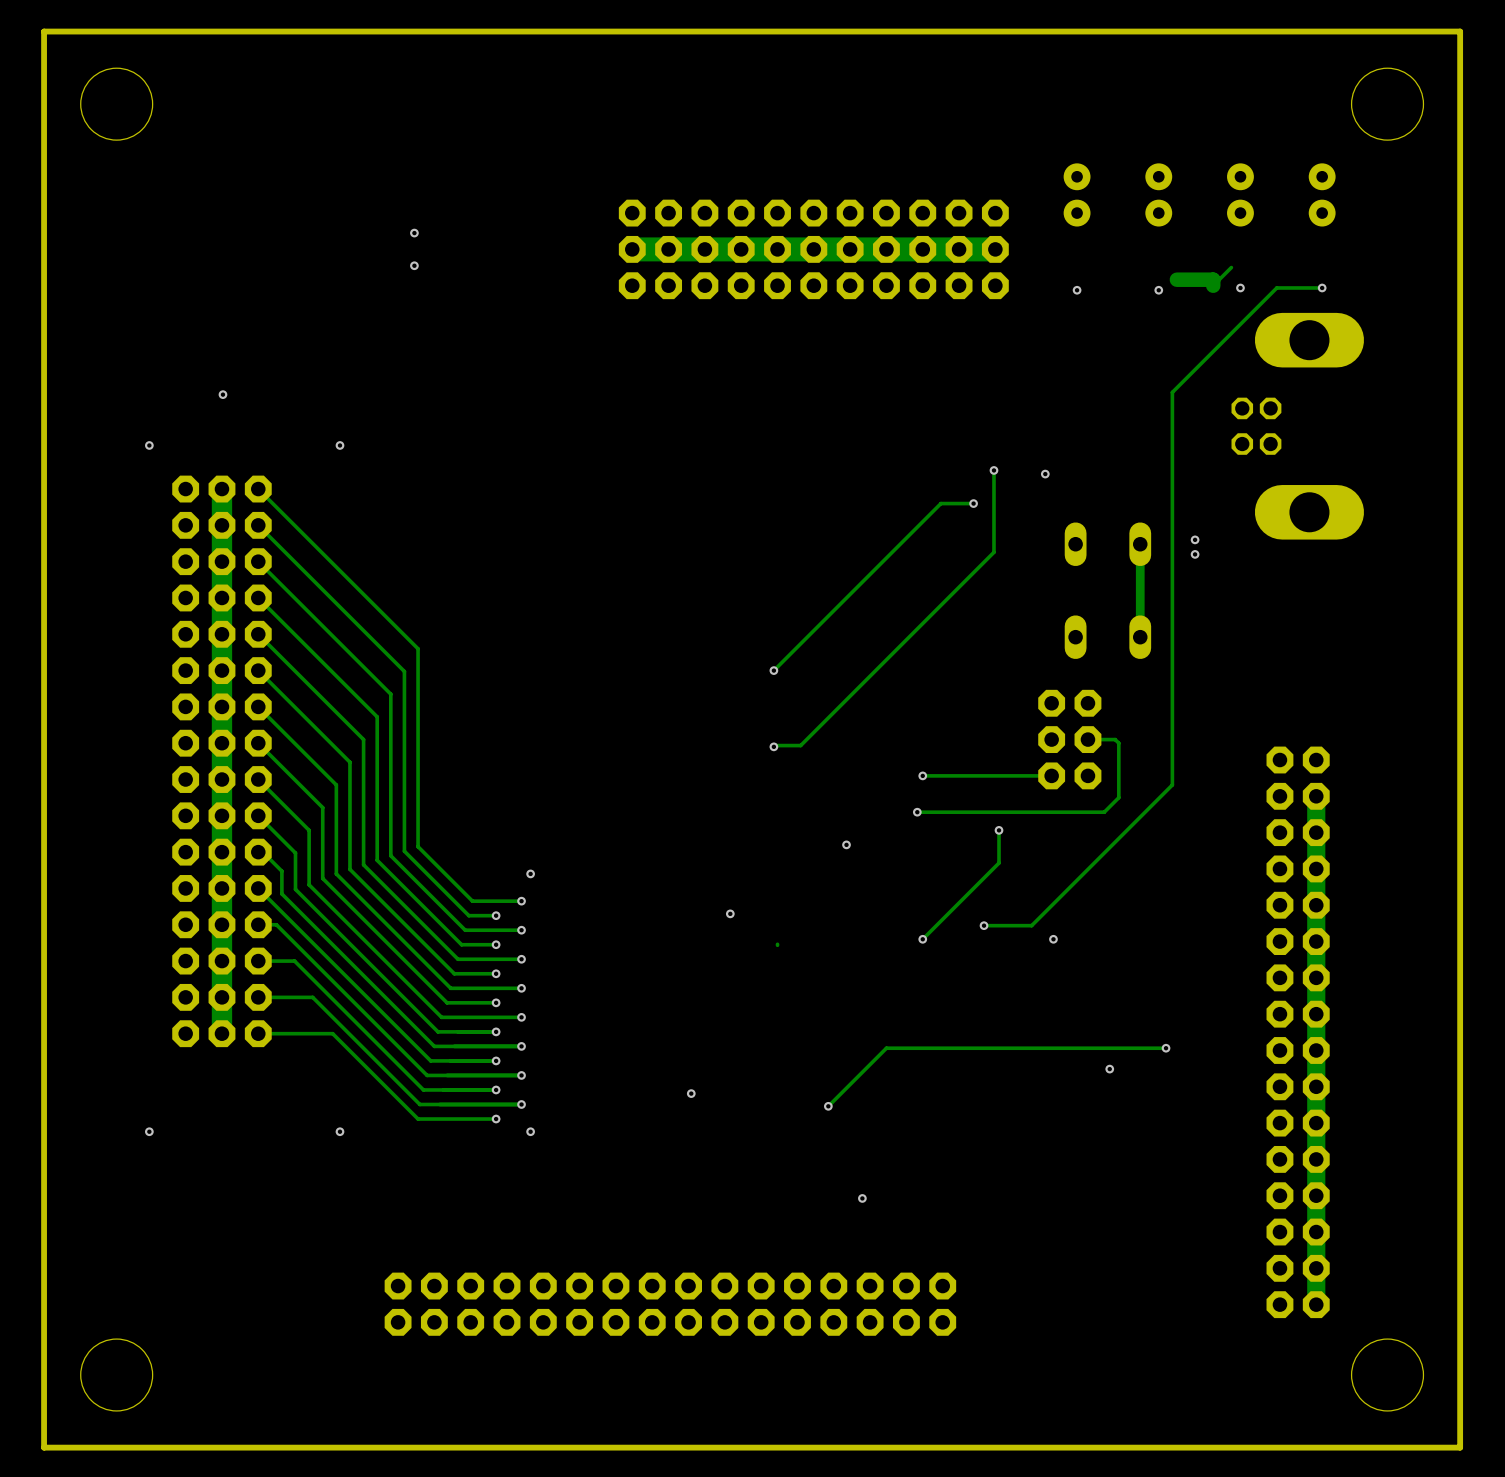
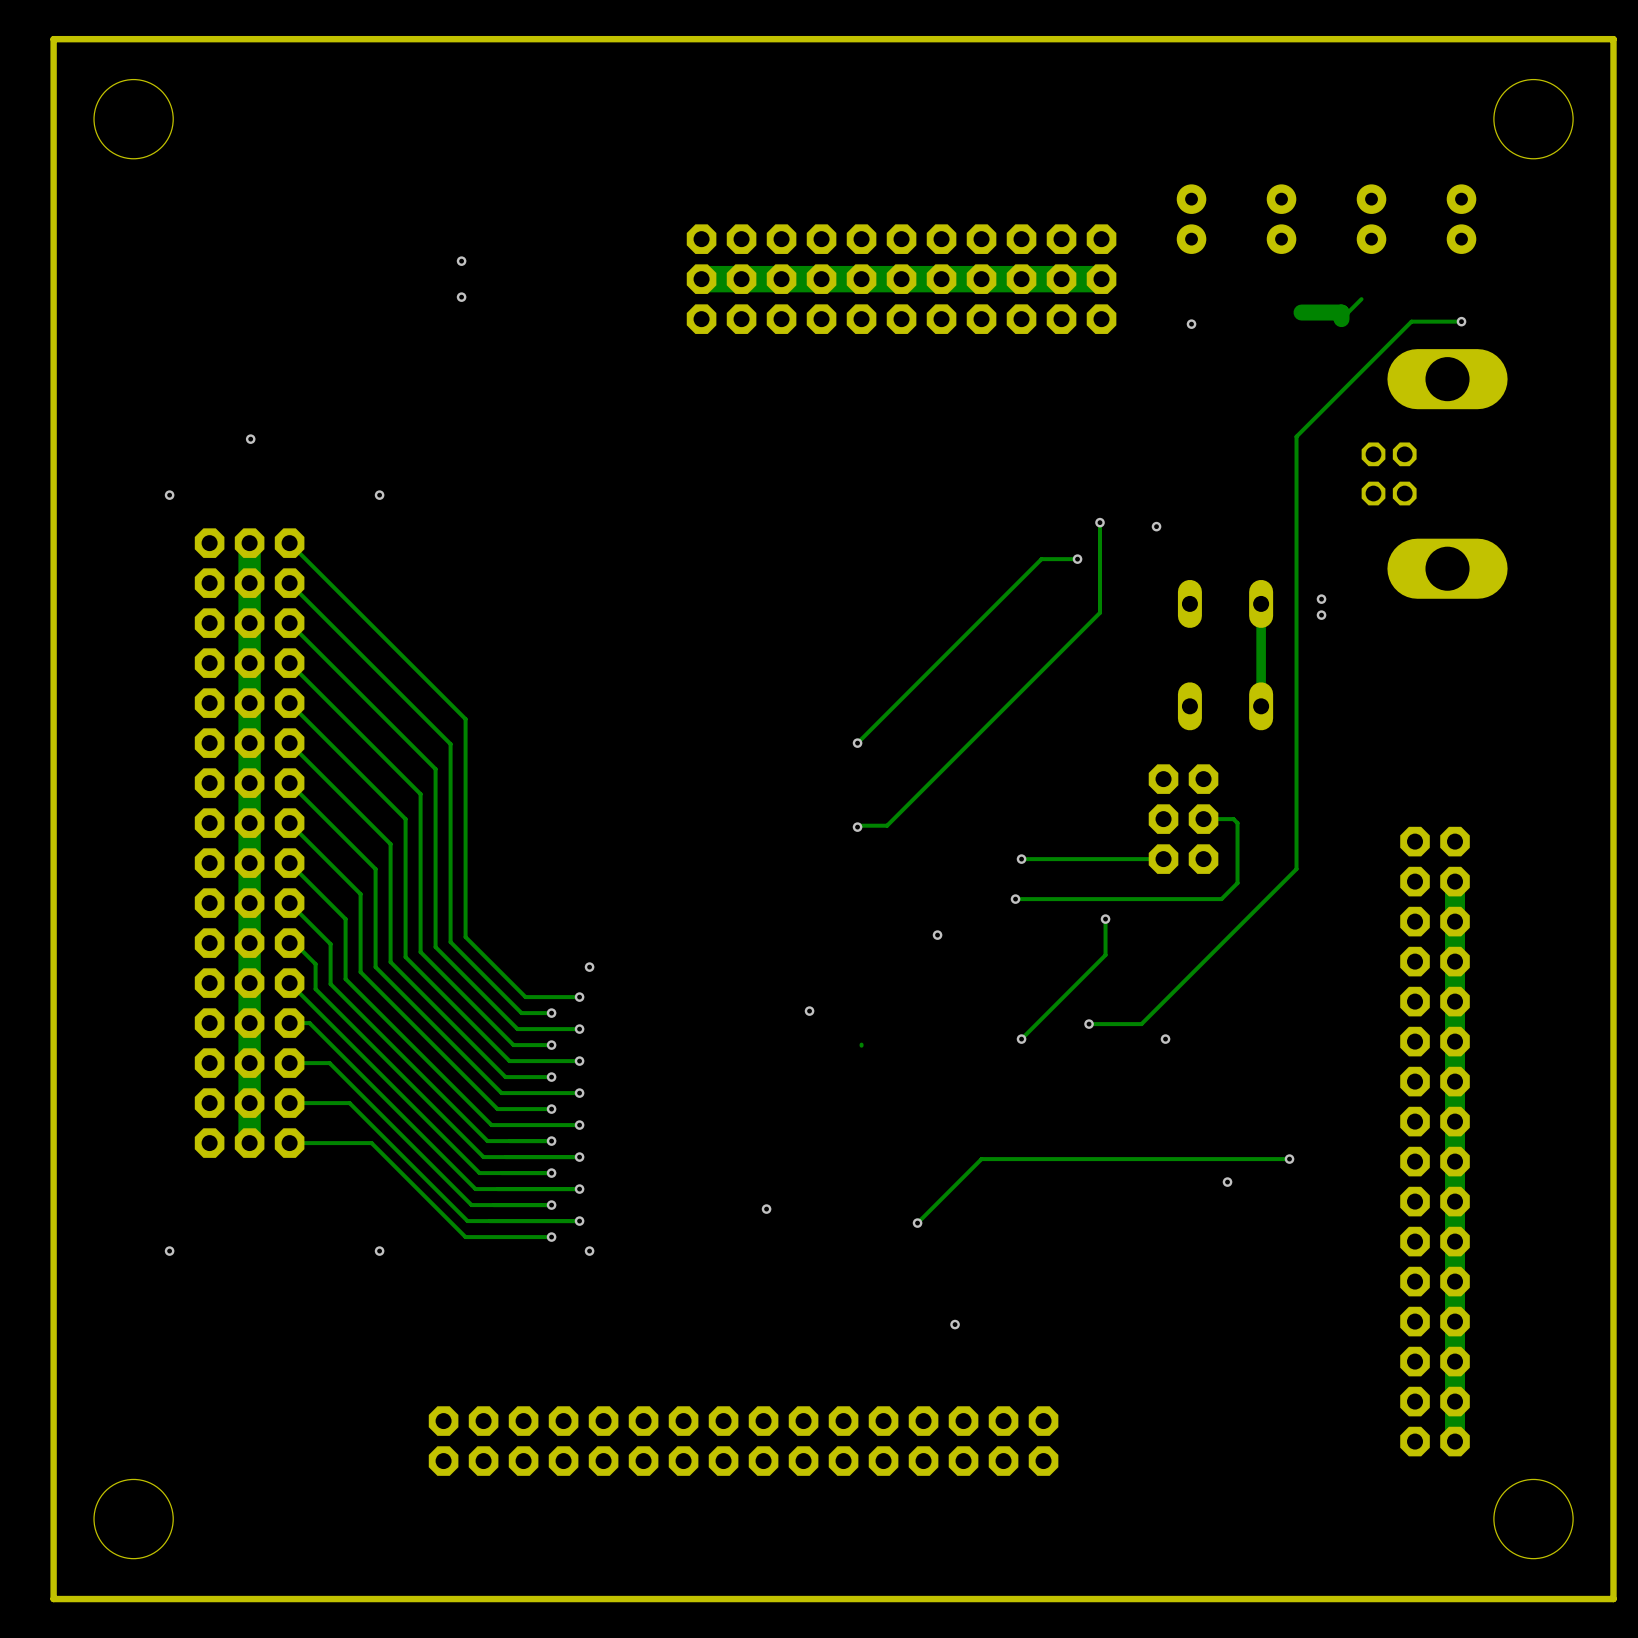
via: (1240, 287) -> none
via: (1158, 290) -> none

